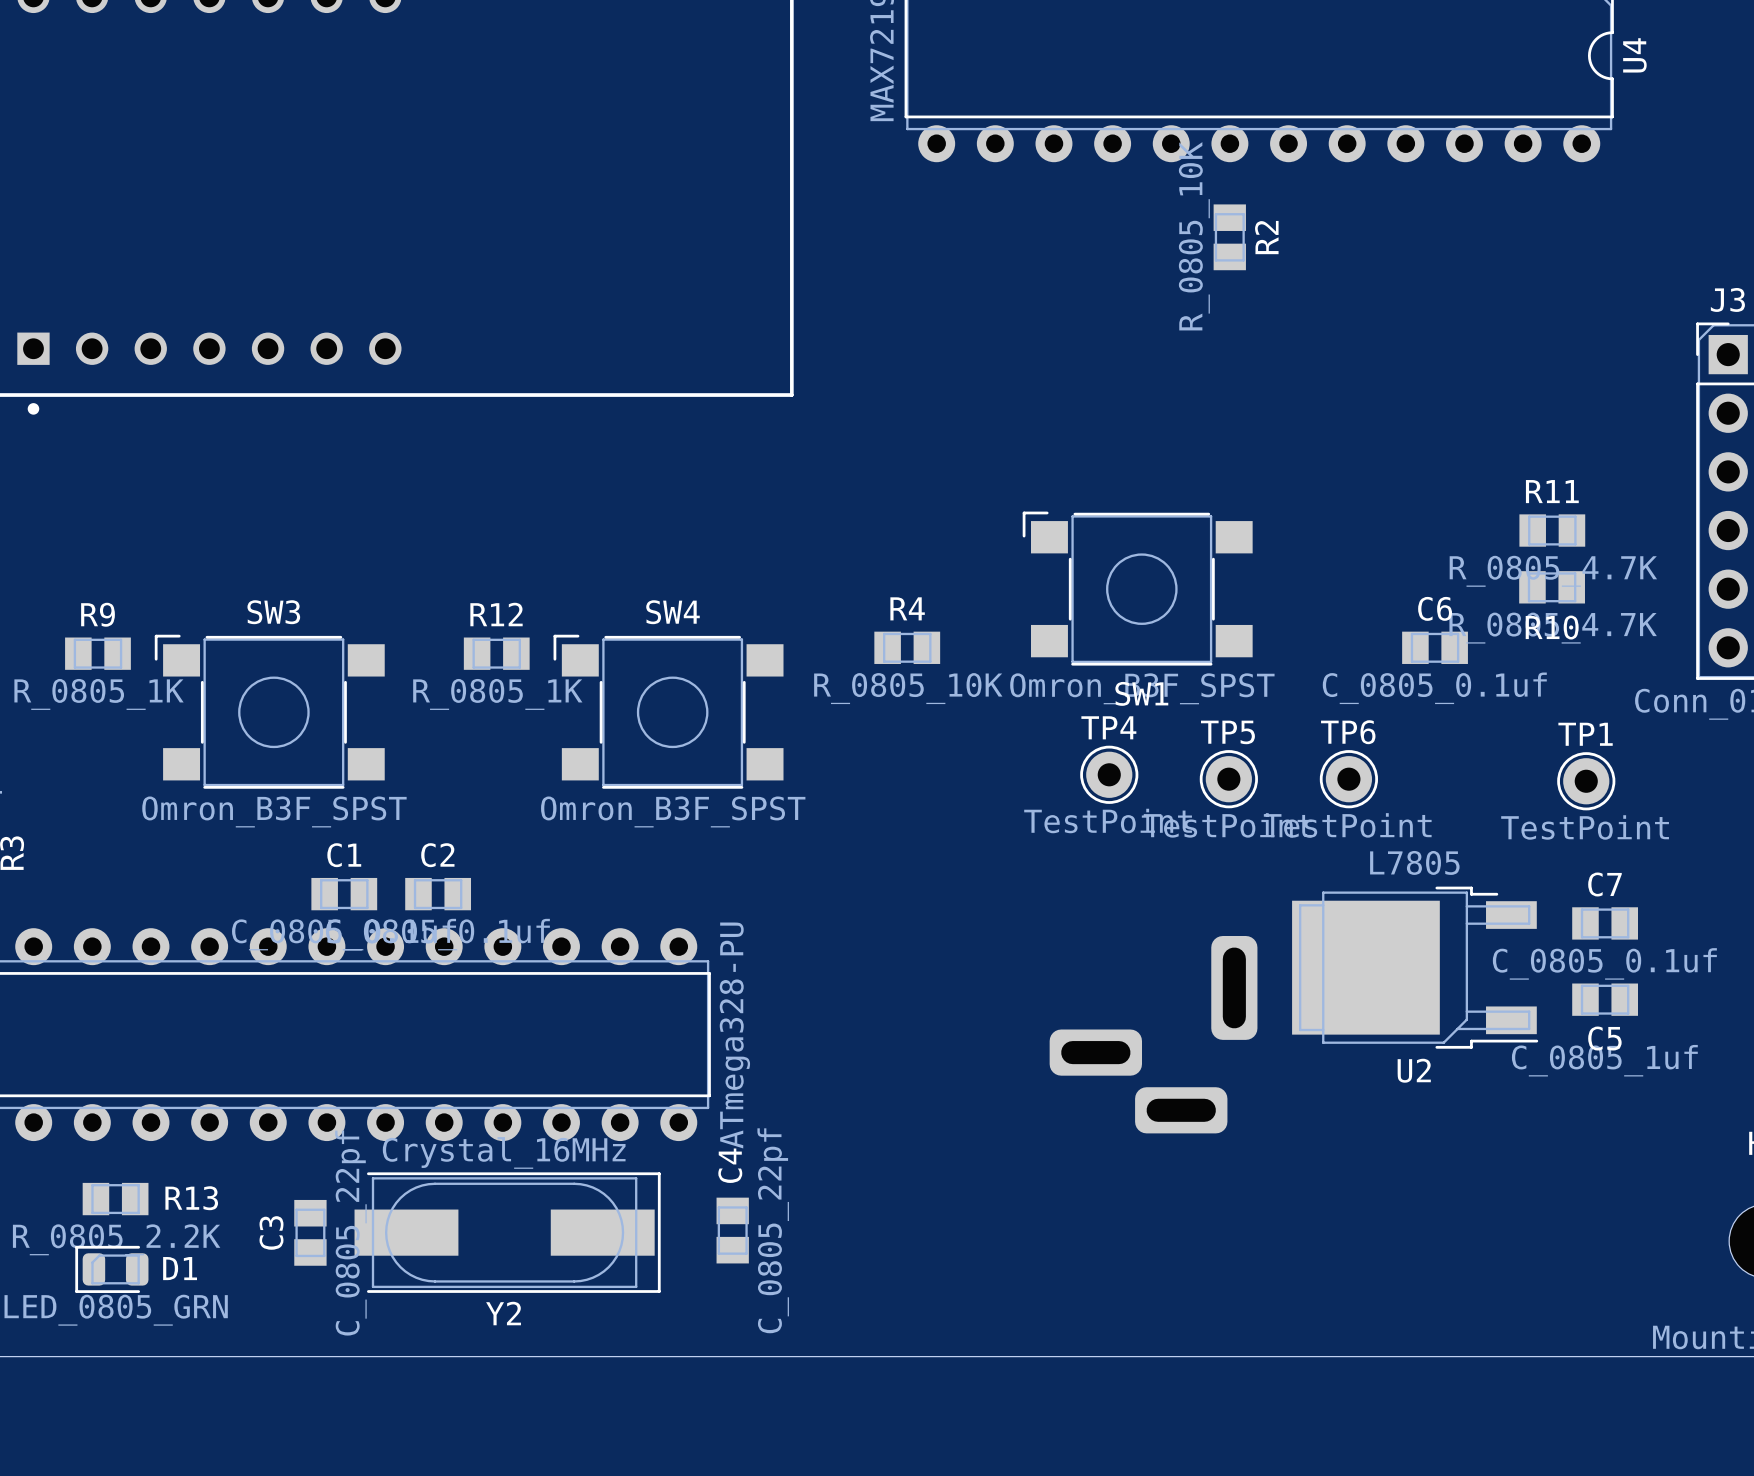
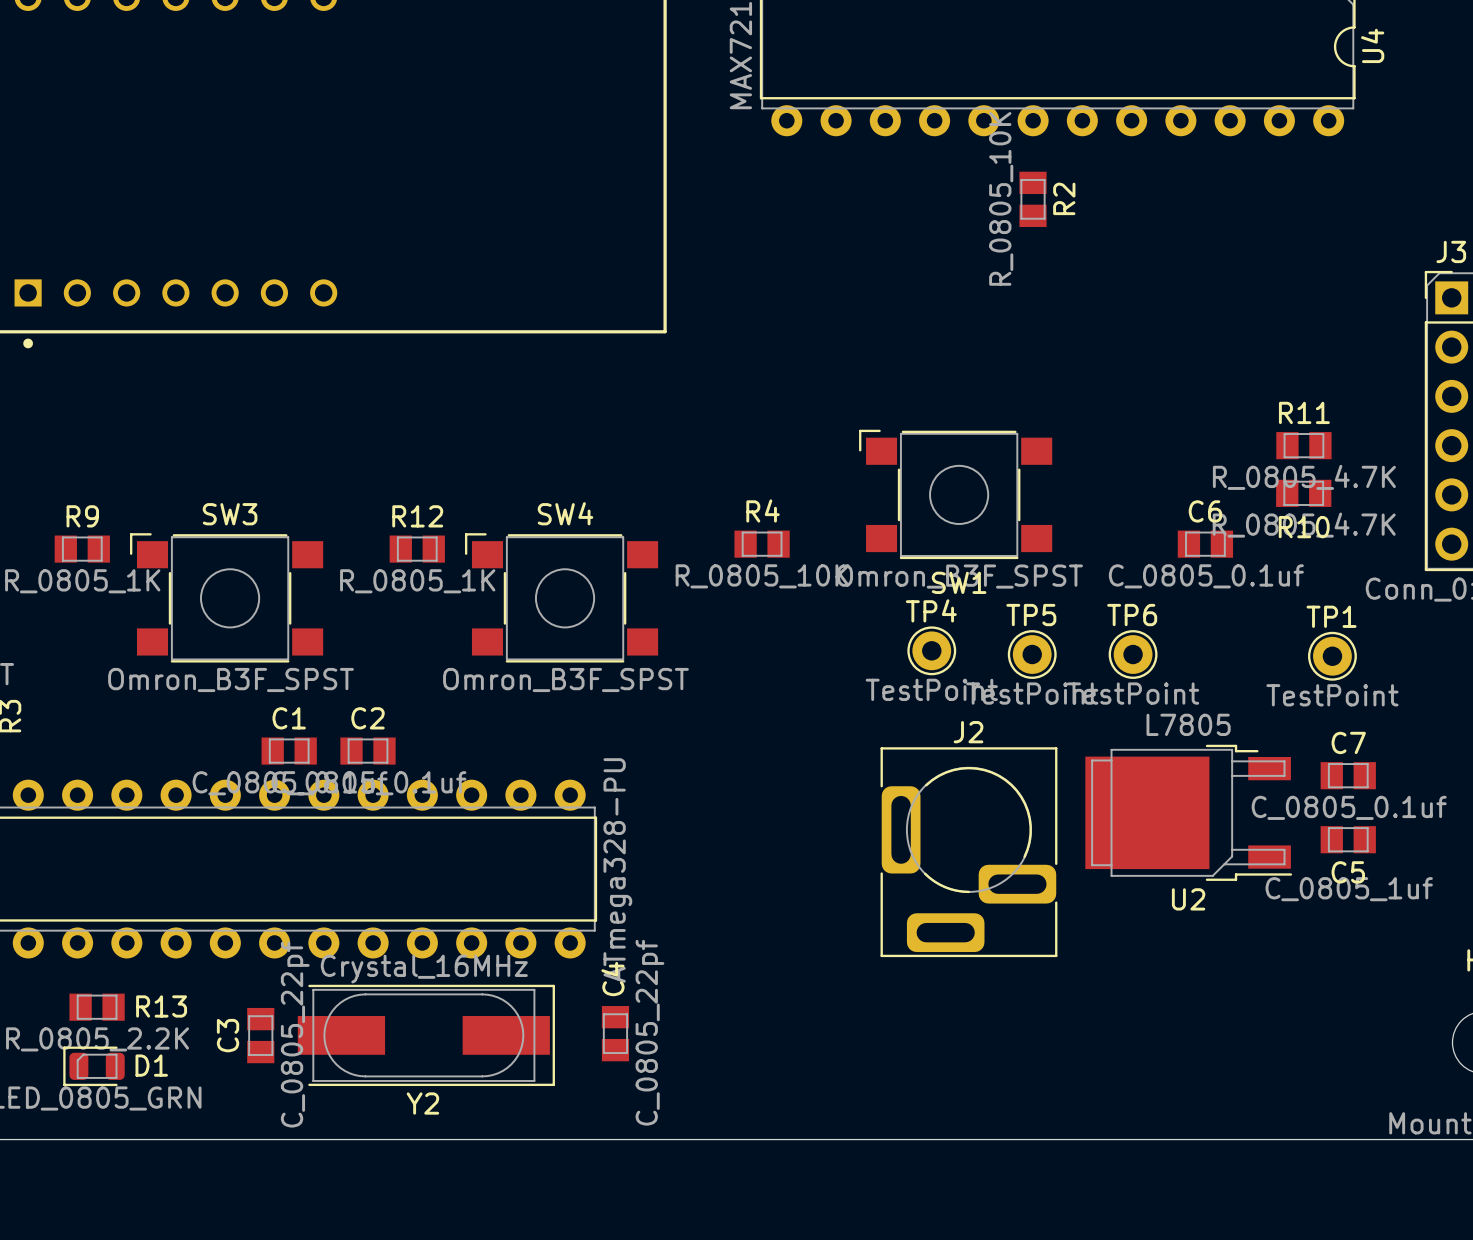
J2 side: bottom (1153, 1034) -> top (968, 852)

